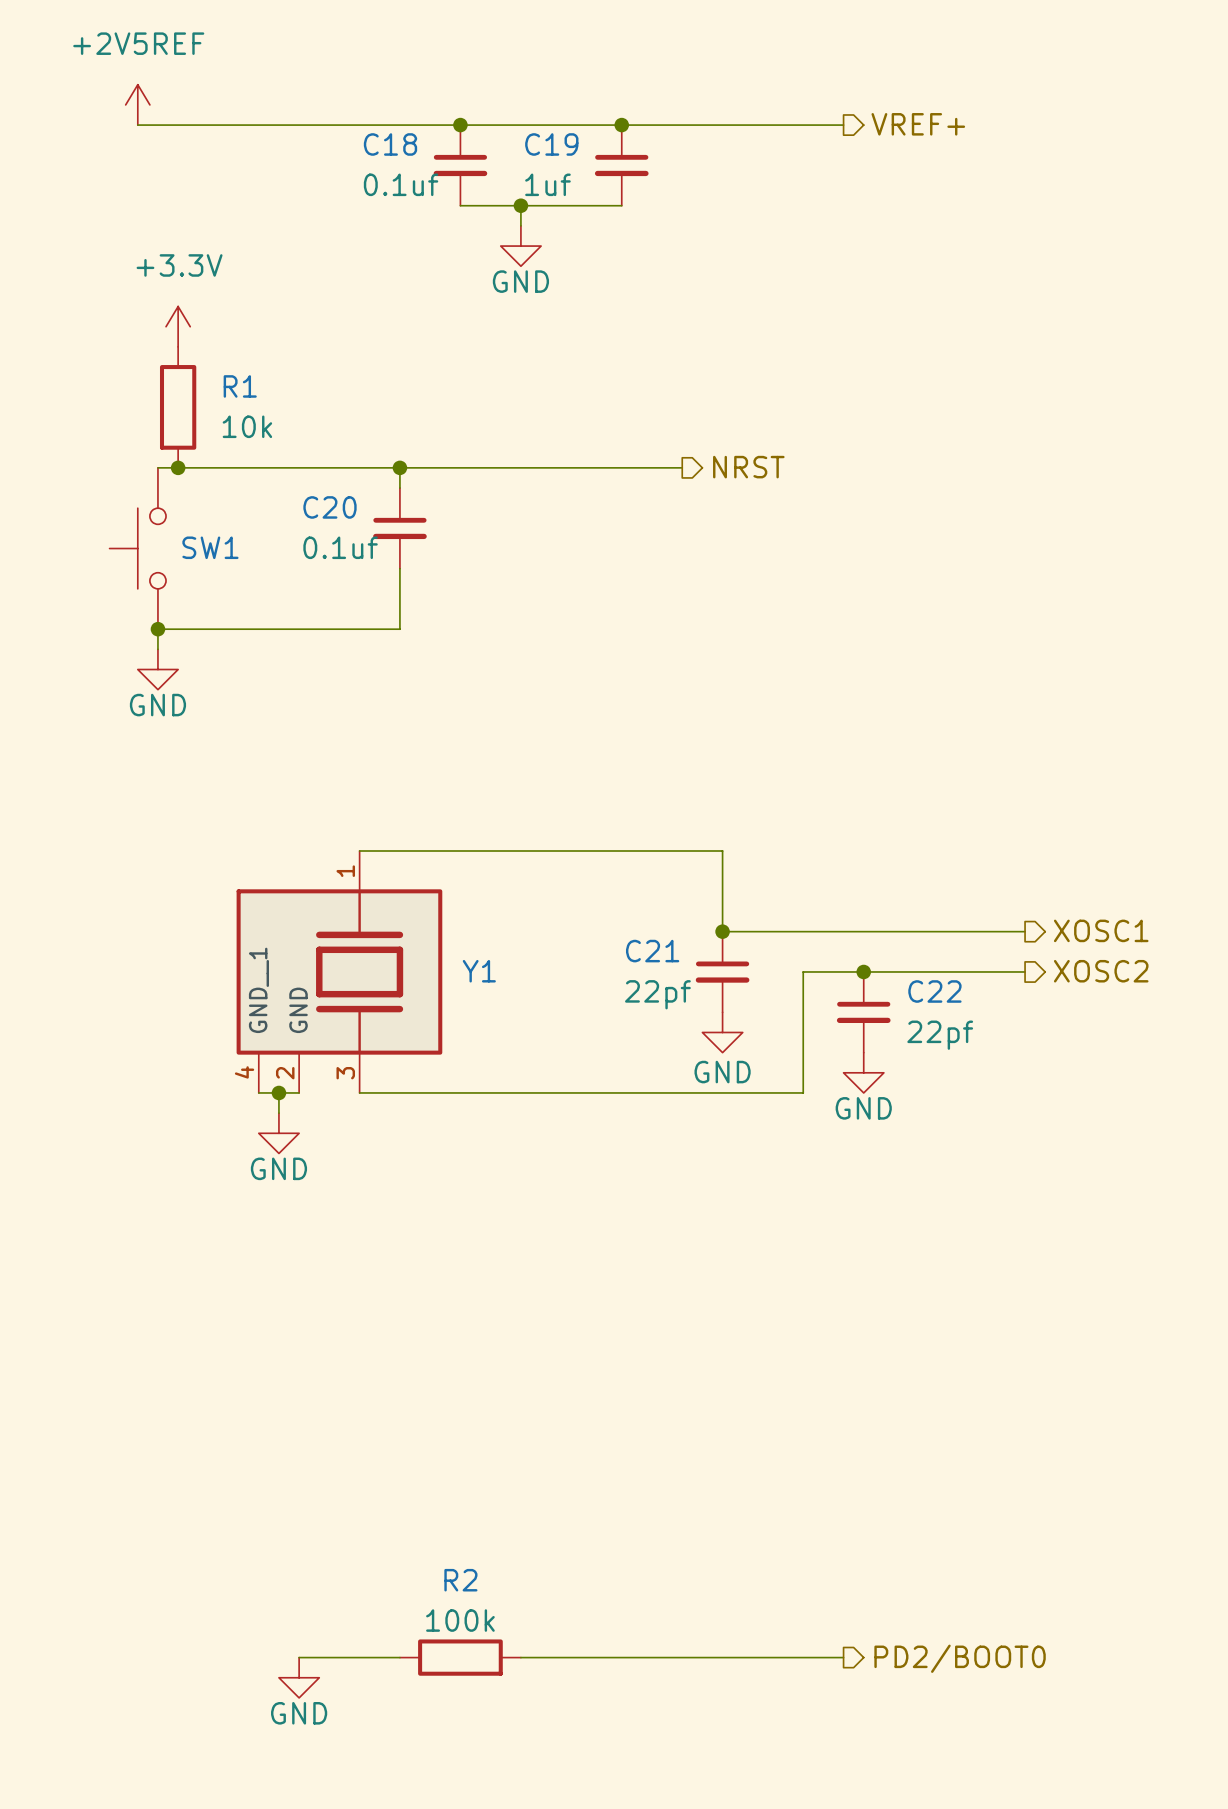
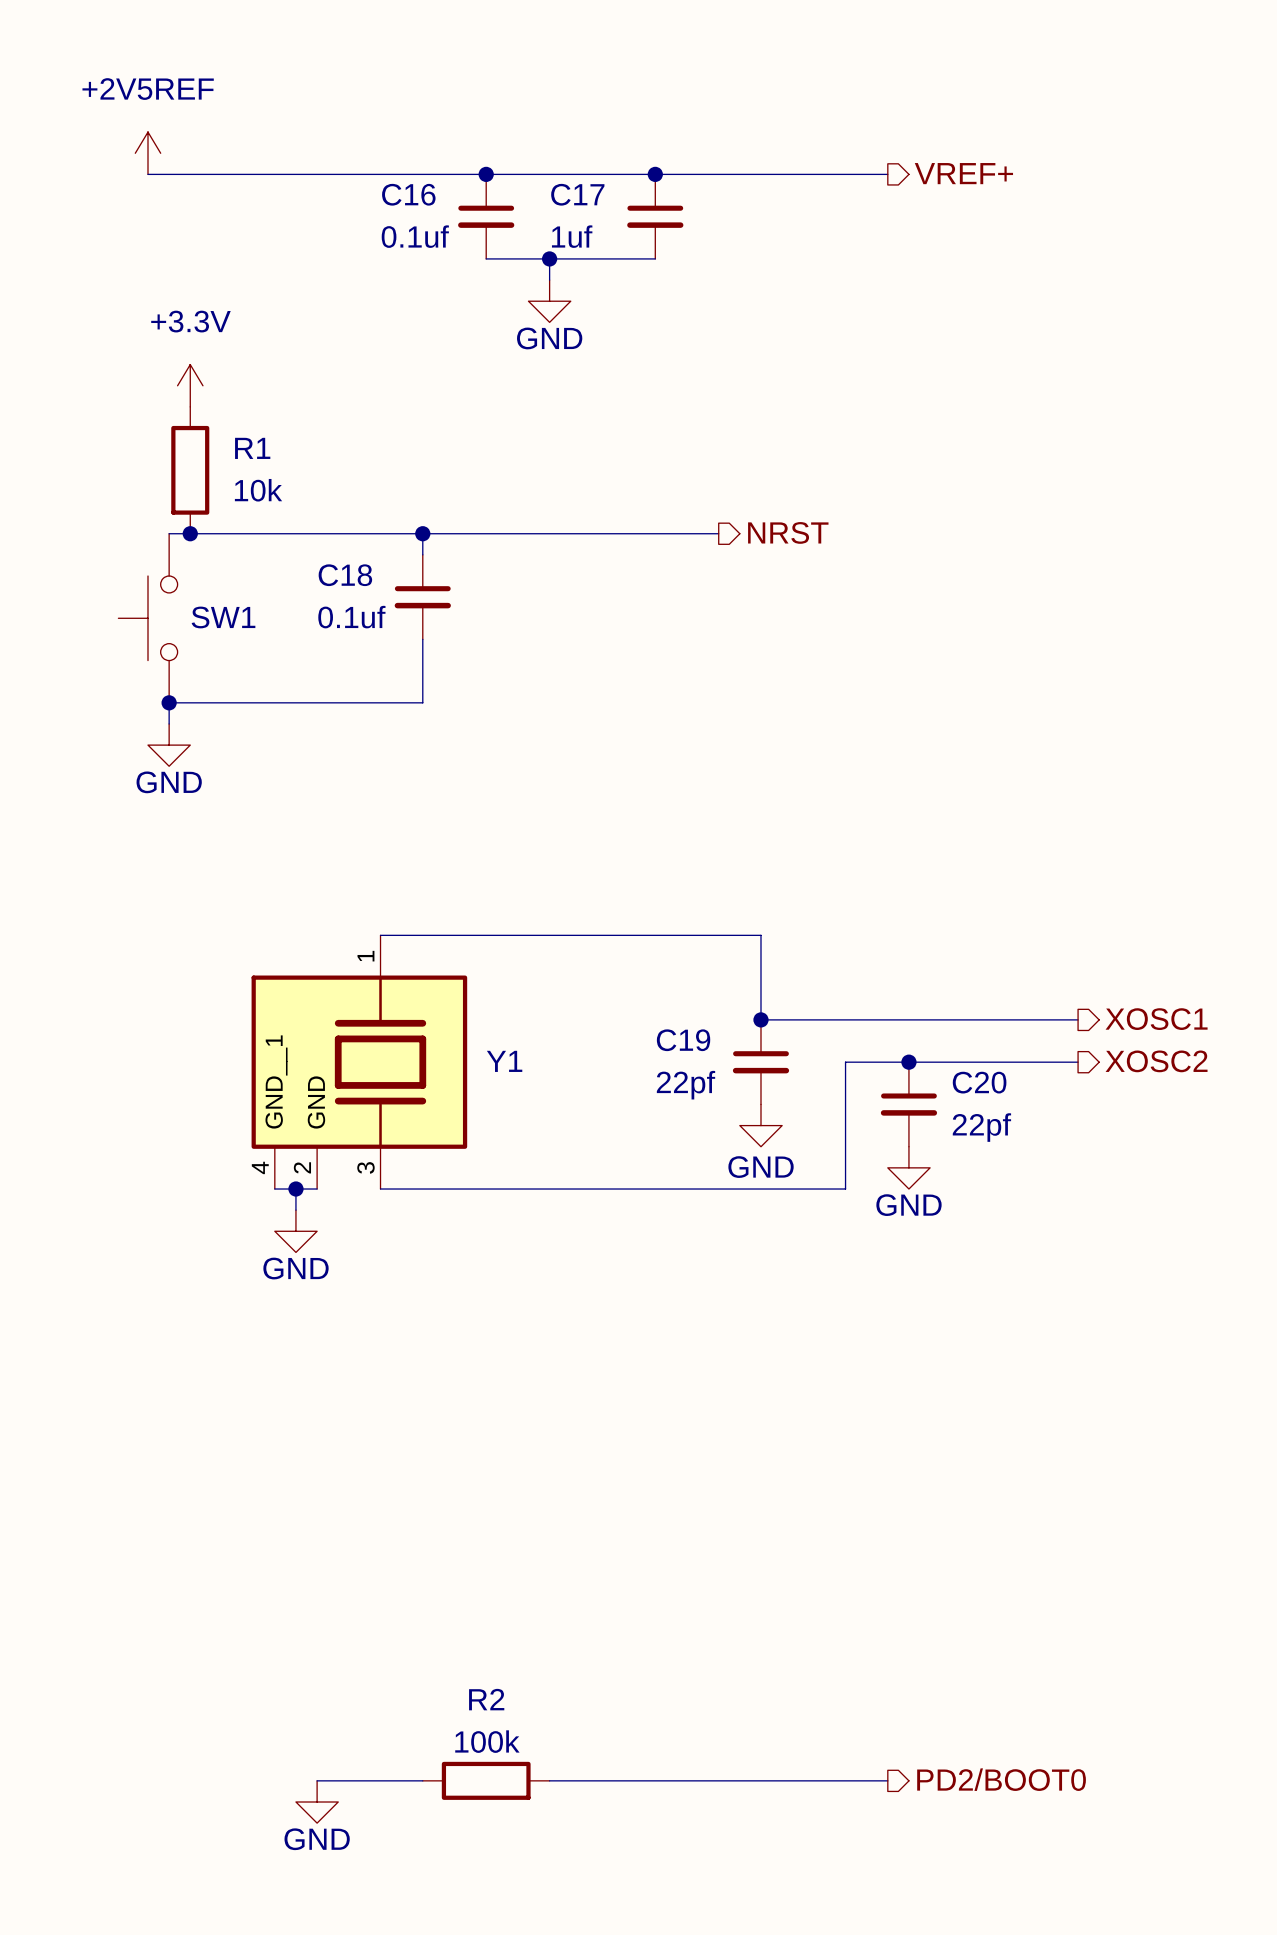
C18 name: C18 (390, 144) -> C16 (408, 194)
C19 name: C19 (551, 144) -> C17 (577, 194)
C20 name: C20 (329, 507) -> C18 (345, 575)
C21 name: C21 (652, 951) -> C19 (683, 1040)
C22 name: C22 (934, 991) -> C20 (979, 1082)

